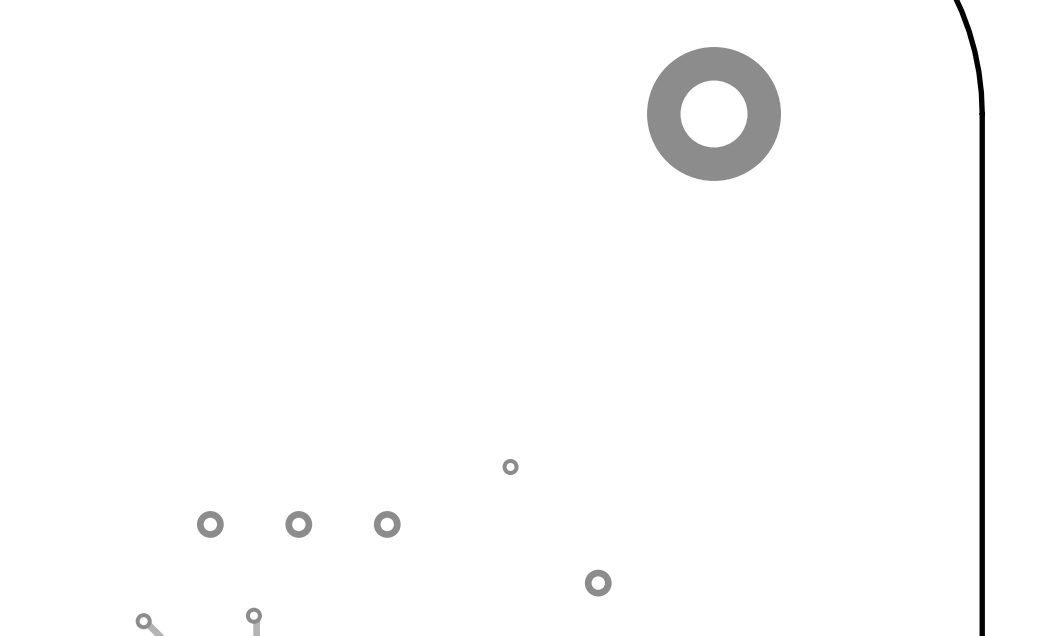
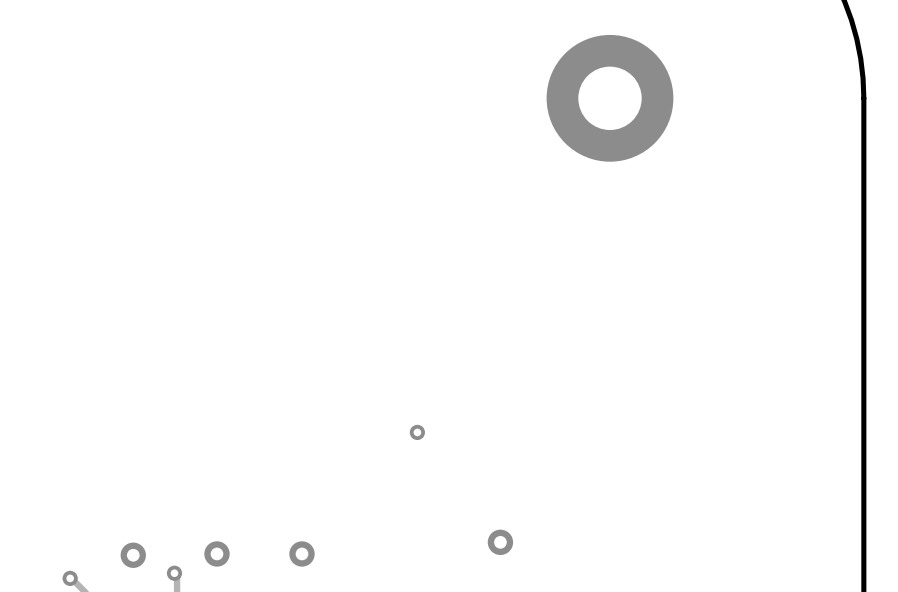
via: (210, 524) -> none
via: (298, 524) -> none
via: (387, 524) -> none
via: none -> (216, 553)
via: none -> (301, 553)
via: none -> (133, 555)

